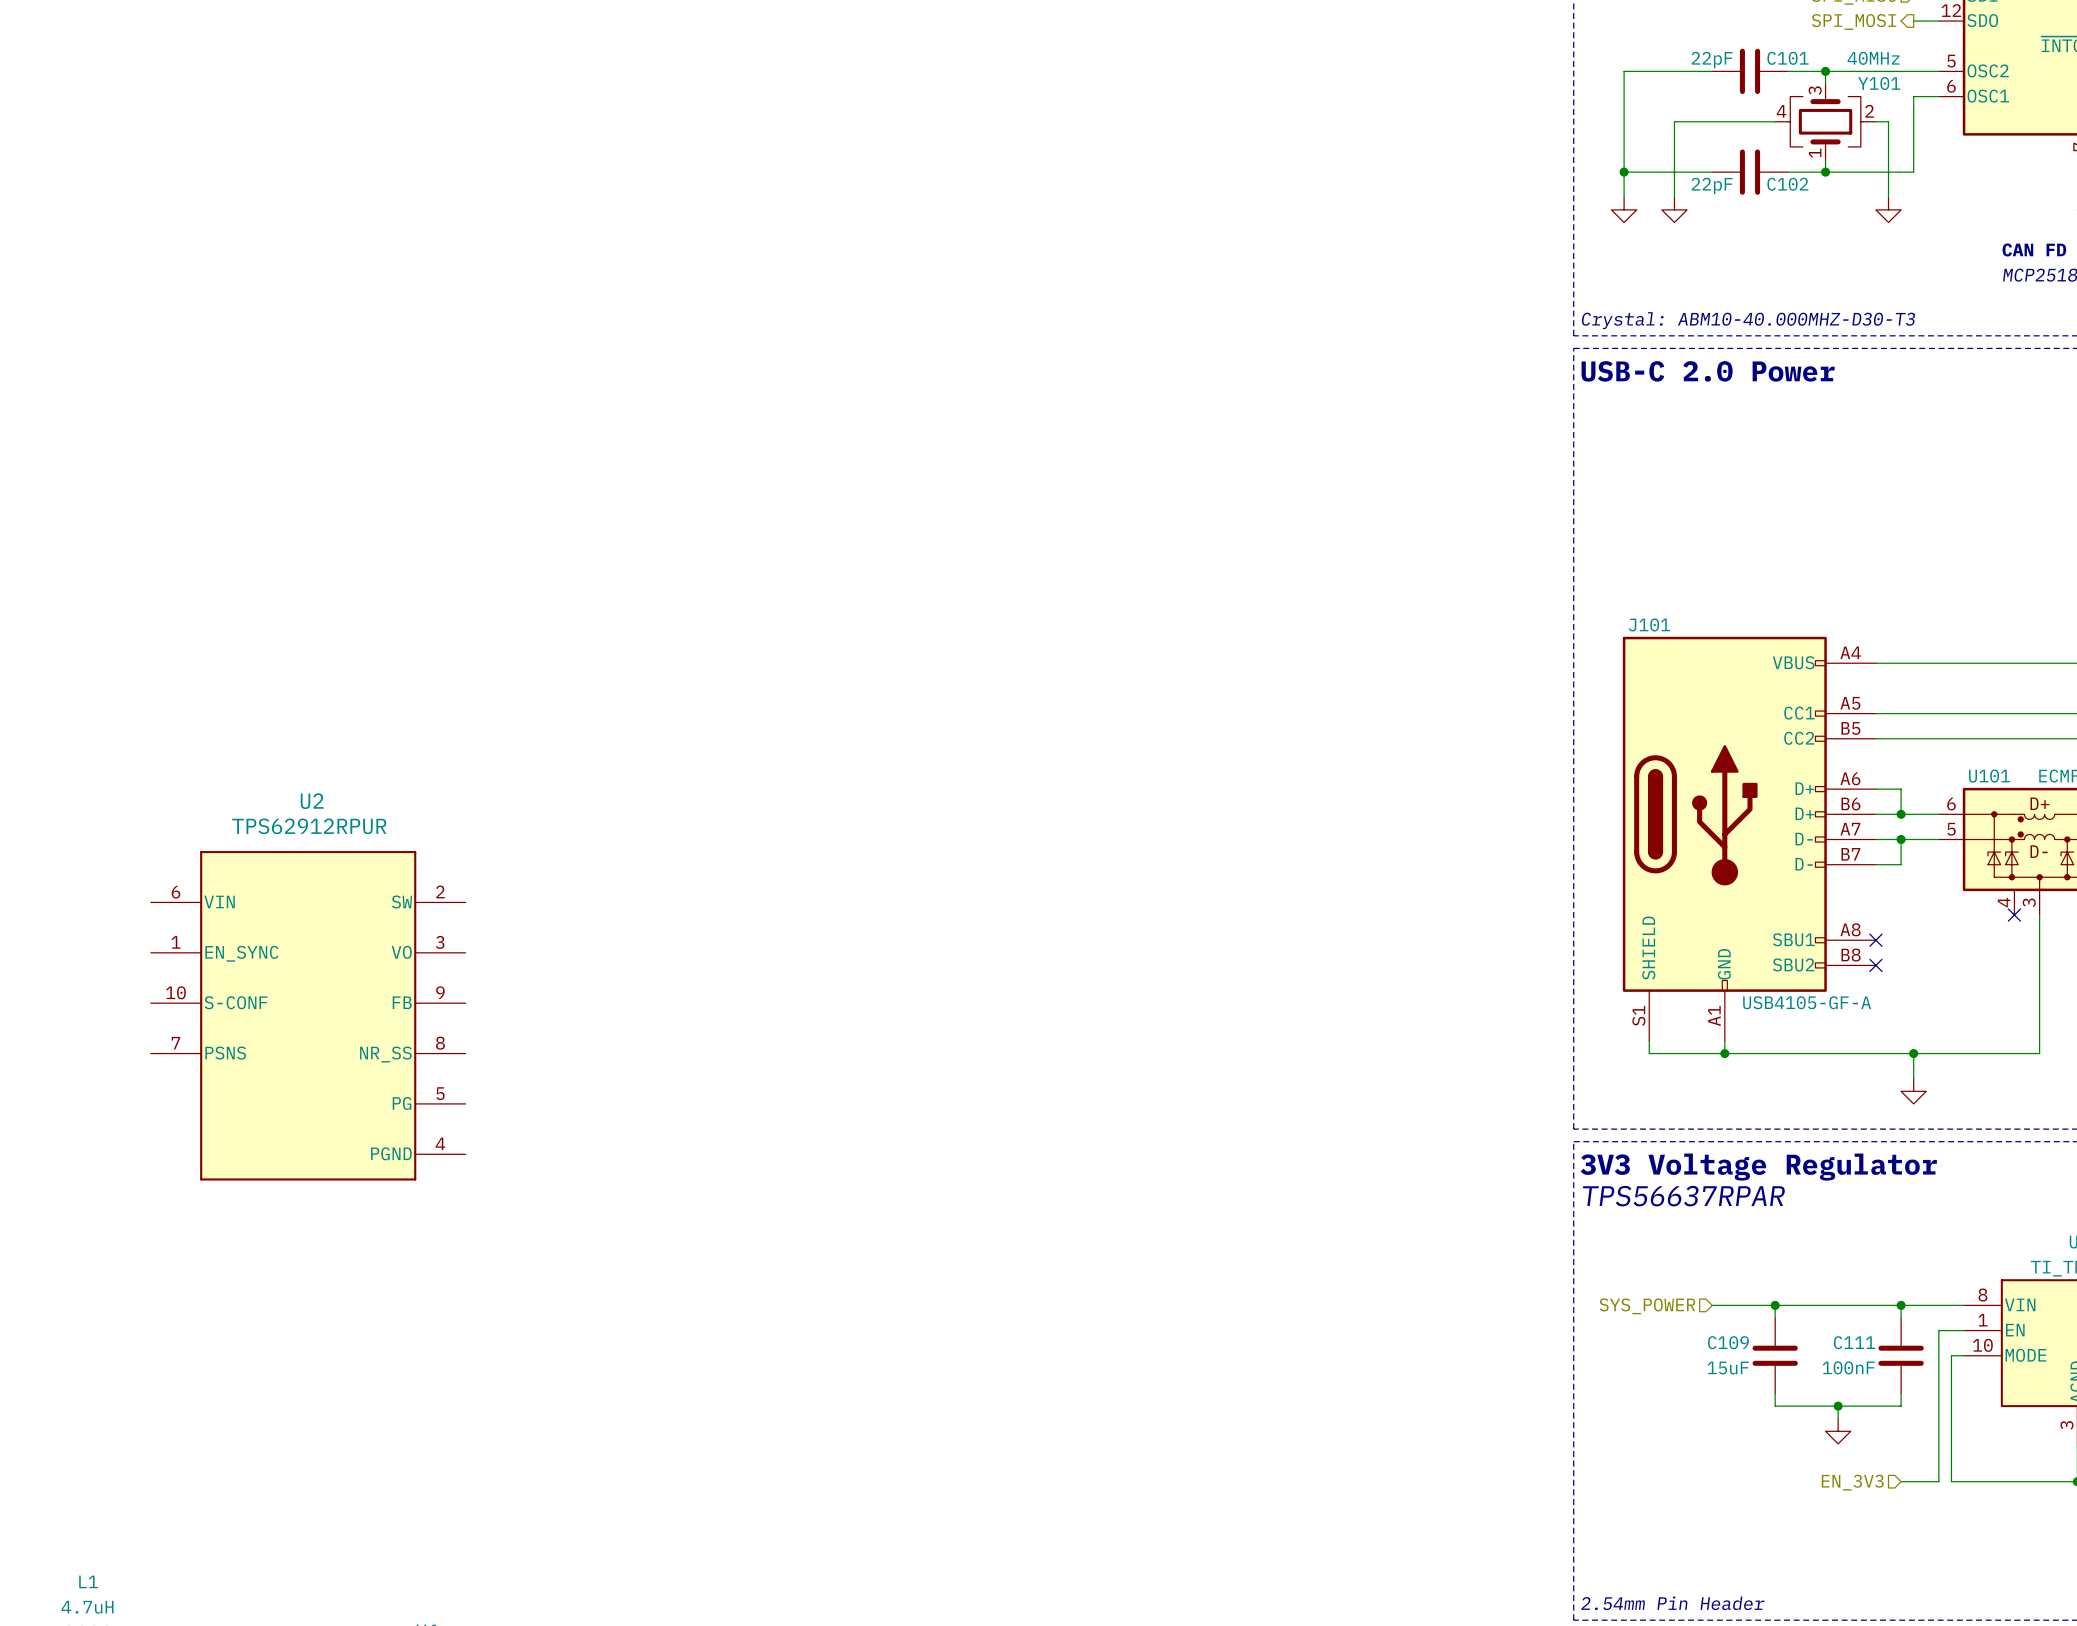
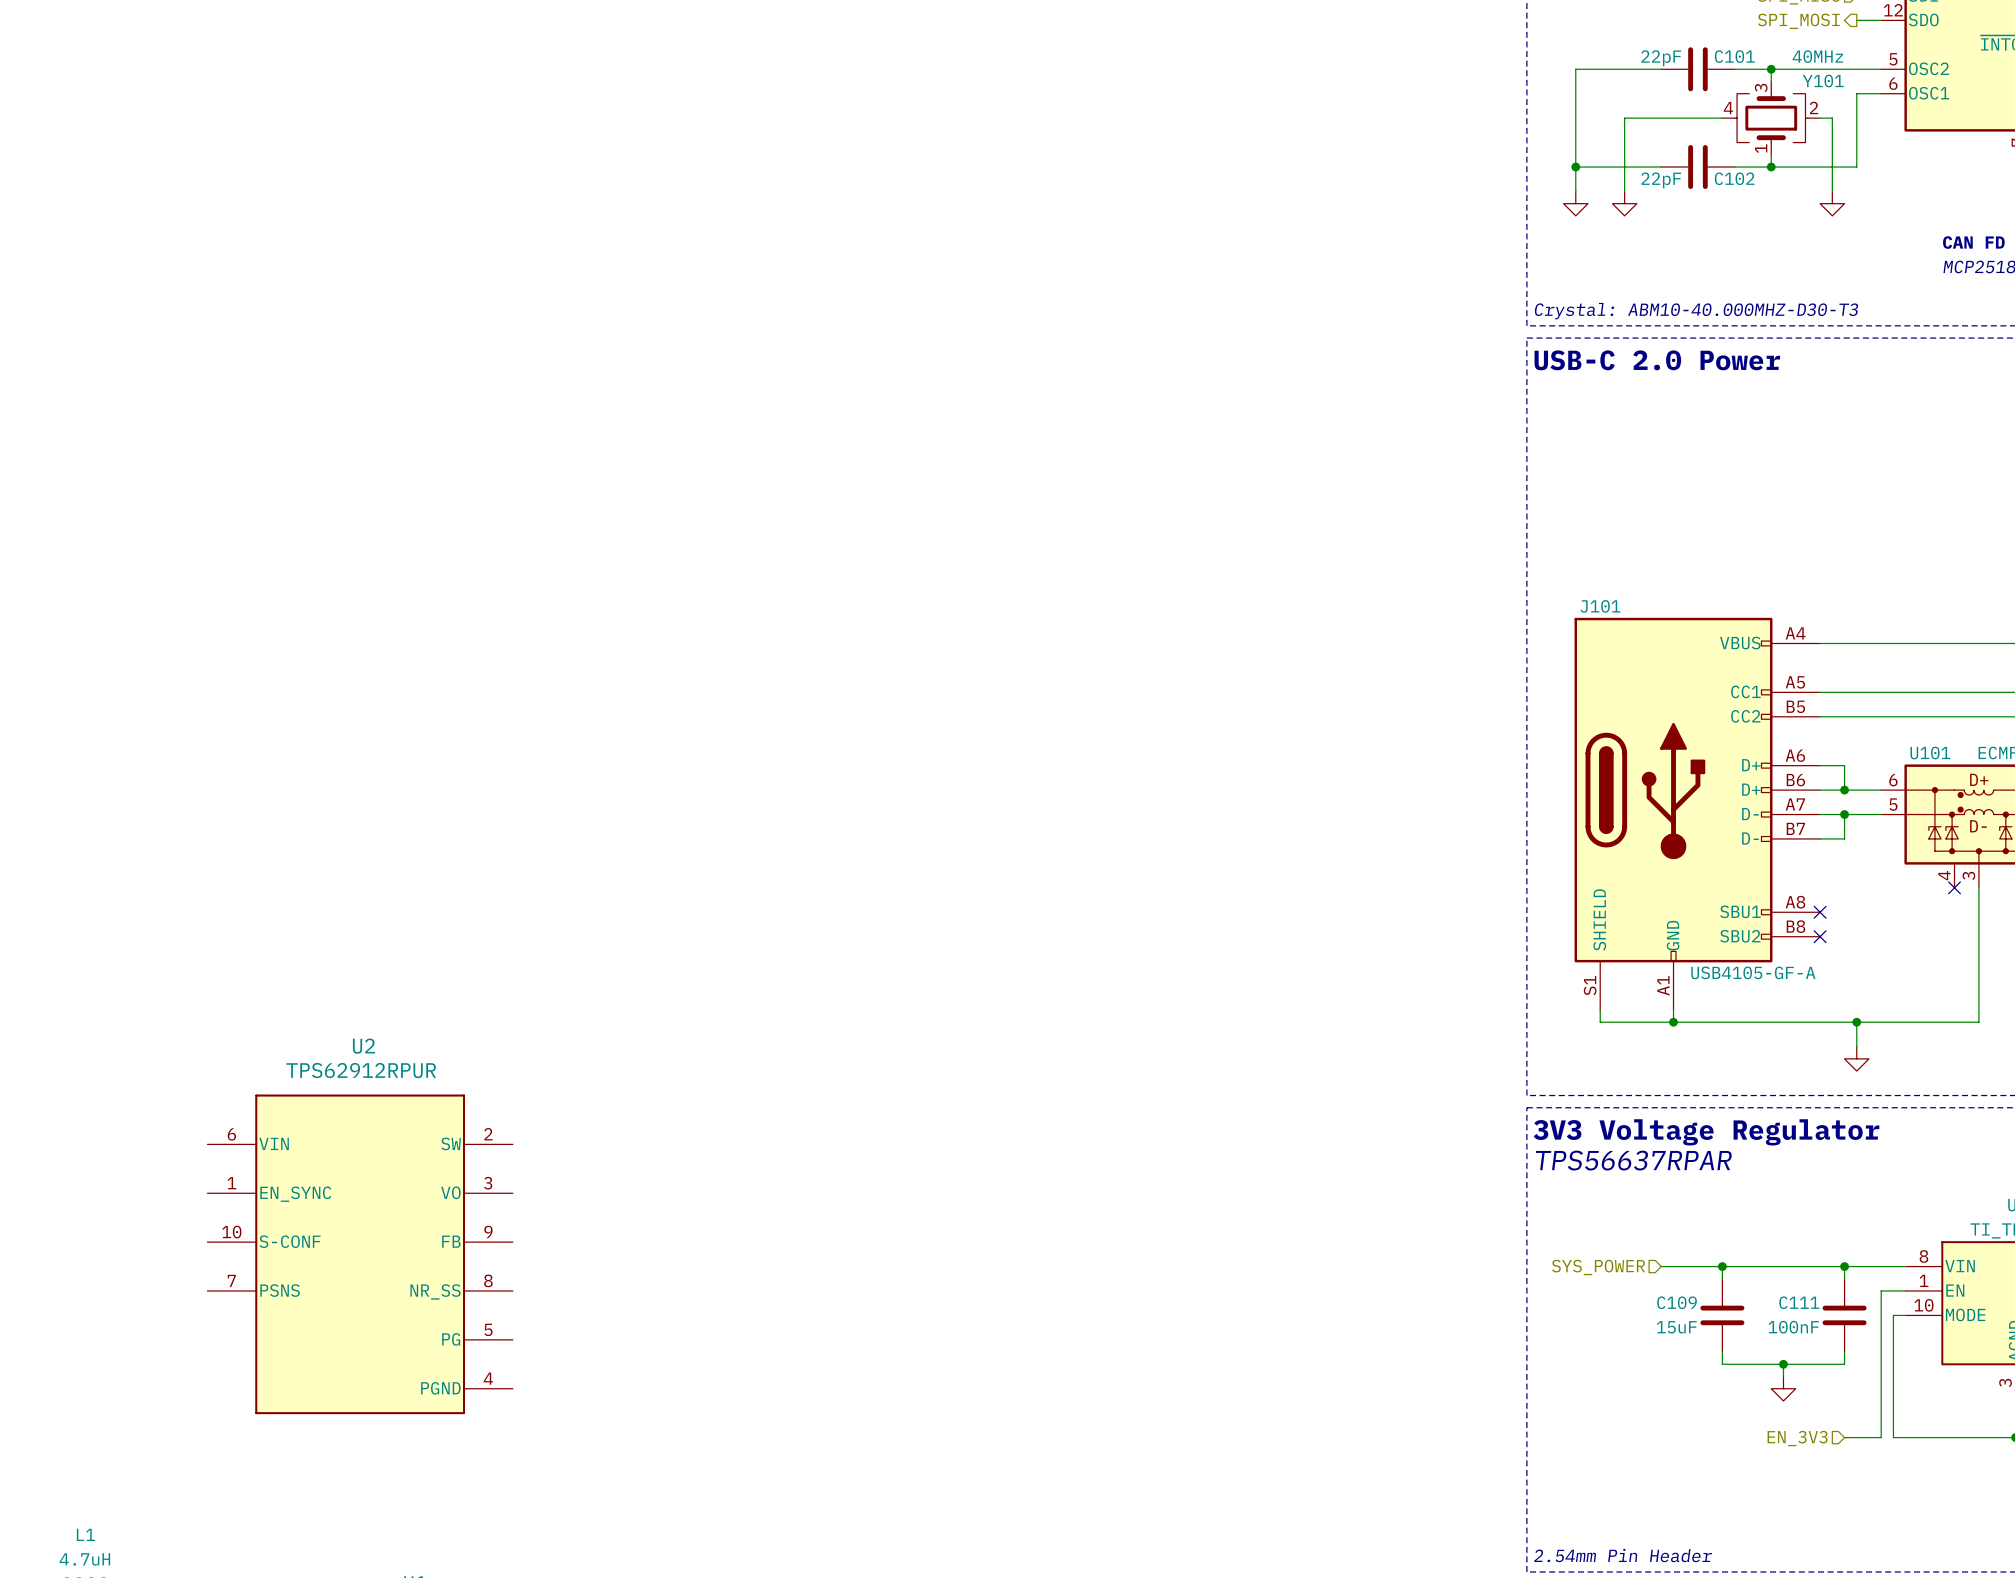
U2 position: (308, 1015) -> (360, 1254)

